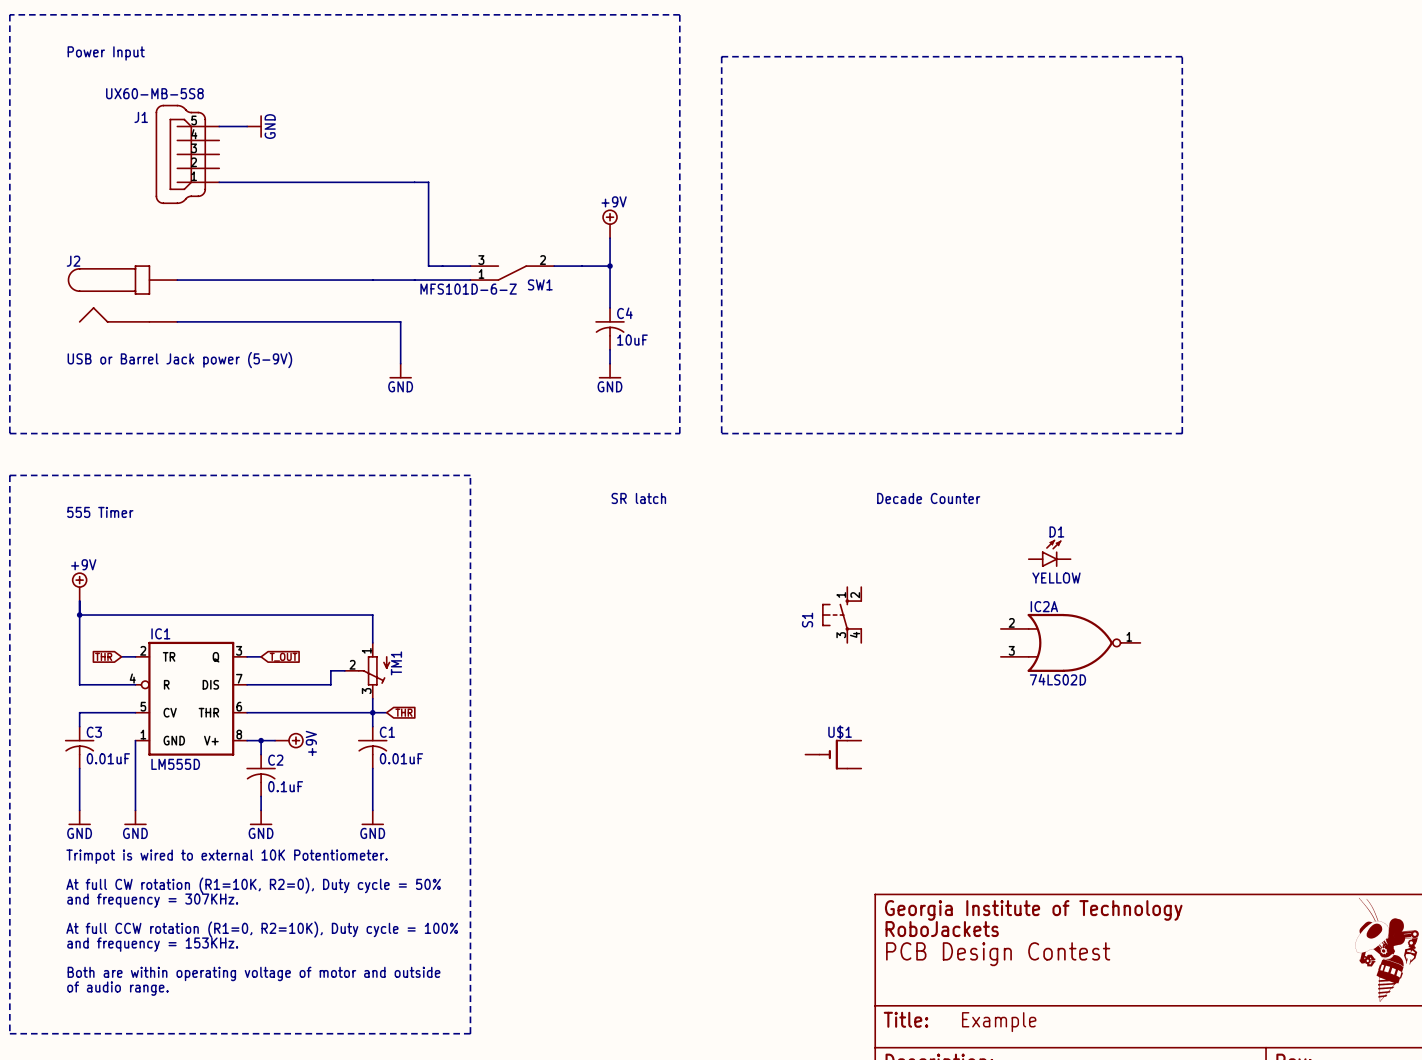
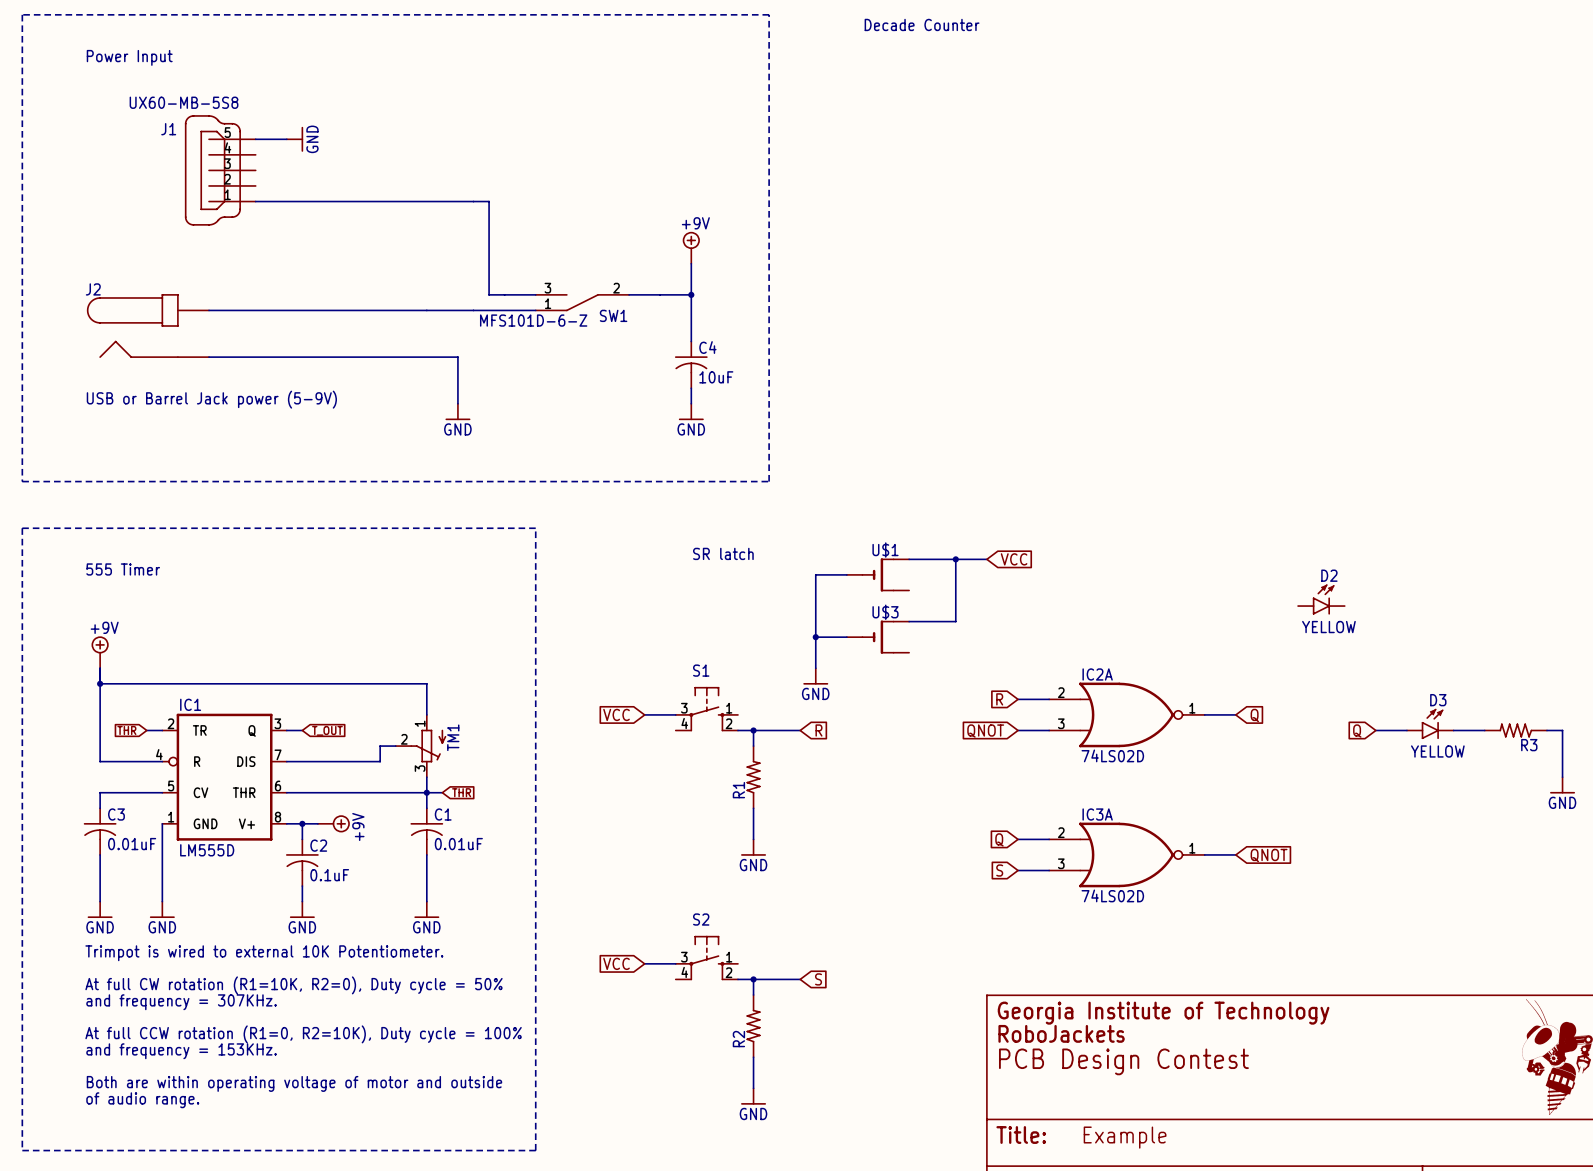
text: none -> Decade Counter (922, 24)
line: (721, 56) (1182, 56) (1182, 433) (721, 433) (721, 56) -> none
text: Decade Counter (928, 498) -> none
wire: none -> (909, 559) (986, 559)
wire: none -> (955, 559) (955, 621) (909, 621)
junction: none -> (955, 559)
global label: none -> VCC (1014, 559)
wire: none -> (846, 574) (815, 574) (815, 668)
D2: none -> YELLOW (1321, 599)
D1: YELLOW (1049, 553) -> none
wire: none -> (815, 637) (846, 637)
junction: none -> (815, 637)
U$3: none -> (878, 637)
power symbol: none -> GND (815, 676)
S1 rotation: 0° (841, 615) -> 90° clockwise (706, 708)
S1 position: (841, 615) -> (706, 708)
global label: none -> R (999, 699)
wire: none -> (1018, 699) (1049, 699)
global label: none -> VCC (616, 714)
wire: none -> (644, 714) (675, 714)
wire: none -> (1204, 714) (1235, 714)
IC2A position: (1070, 642) -> (1126, 714)
global label: none -> Q (1254, 715)
D3: none -> YELLOW (1430, 724)
wire: none -> (737, 730) (800, 730)
wire: none -> (753, 730) (753, 746)
junction: none -> (753, 730)
global label: none -> R (818, 730)
wire: none -> (1018, 730) (1049, 730)
wire: none -> (1375, 730) (1406, 730)
wire: none -> (1453, 730) (1484, 730)
R3: none -> (1515, 730)
wire: none -> (1546, 730) (1562, 730) (1562, 777)
global label: none -> QNOT (985, 731)
global label: none -> Q (1357, 731)
R1: none -> (753, 777)
power symbol: none -> GND (1562, 785)
wire: none -> (753, 808) (753, 839)
U$1 position: (833, 754) -> (878, 574)
wire: none -> (1018, 839) (1049, 839)
global label: none -> Q (999, 839)
power symbol: none -> GND (753, 847)
IC3A: none -> 74LS02D (1126, 854)
wire: none -> (1204, 854) (1235, 854)
global label: none -> QNOT (1269, 855)
global label: none -> S (999, 870)
wire: none -> (1018, 870) (1049, 870)
S2: none -> (706, 957)
global label: none -> VCC (616, 963)
wire: none -> (644, 963) (675, 963)
wire: none -> (737, 979) (800, 979)
wire: none -> (753, 979) (753, 994)
junction: none -> (753, 979)
global label: none -> S (818, 979)
R2: none -> (753, 1026)
wire: none -> (753, 1057) (753, 1088)
power symbol: none -> GND (753, 1096)

